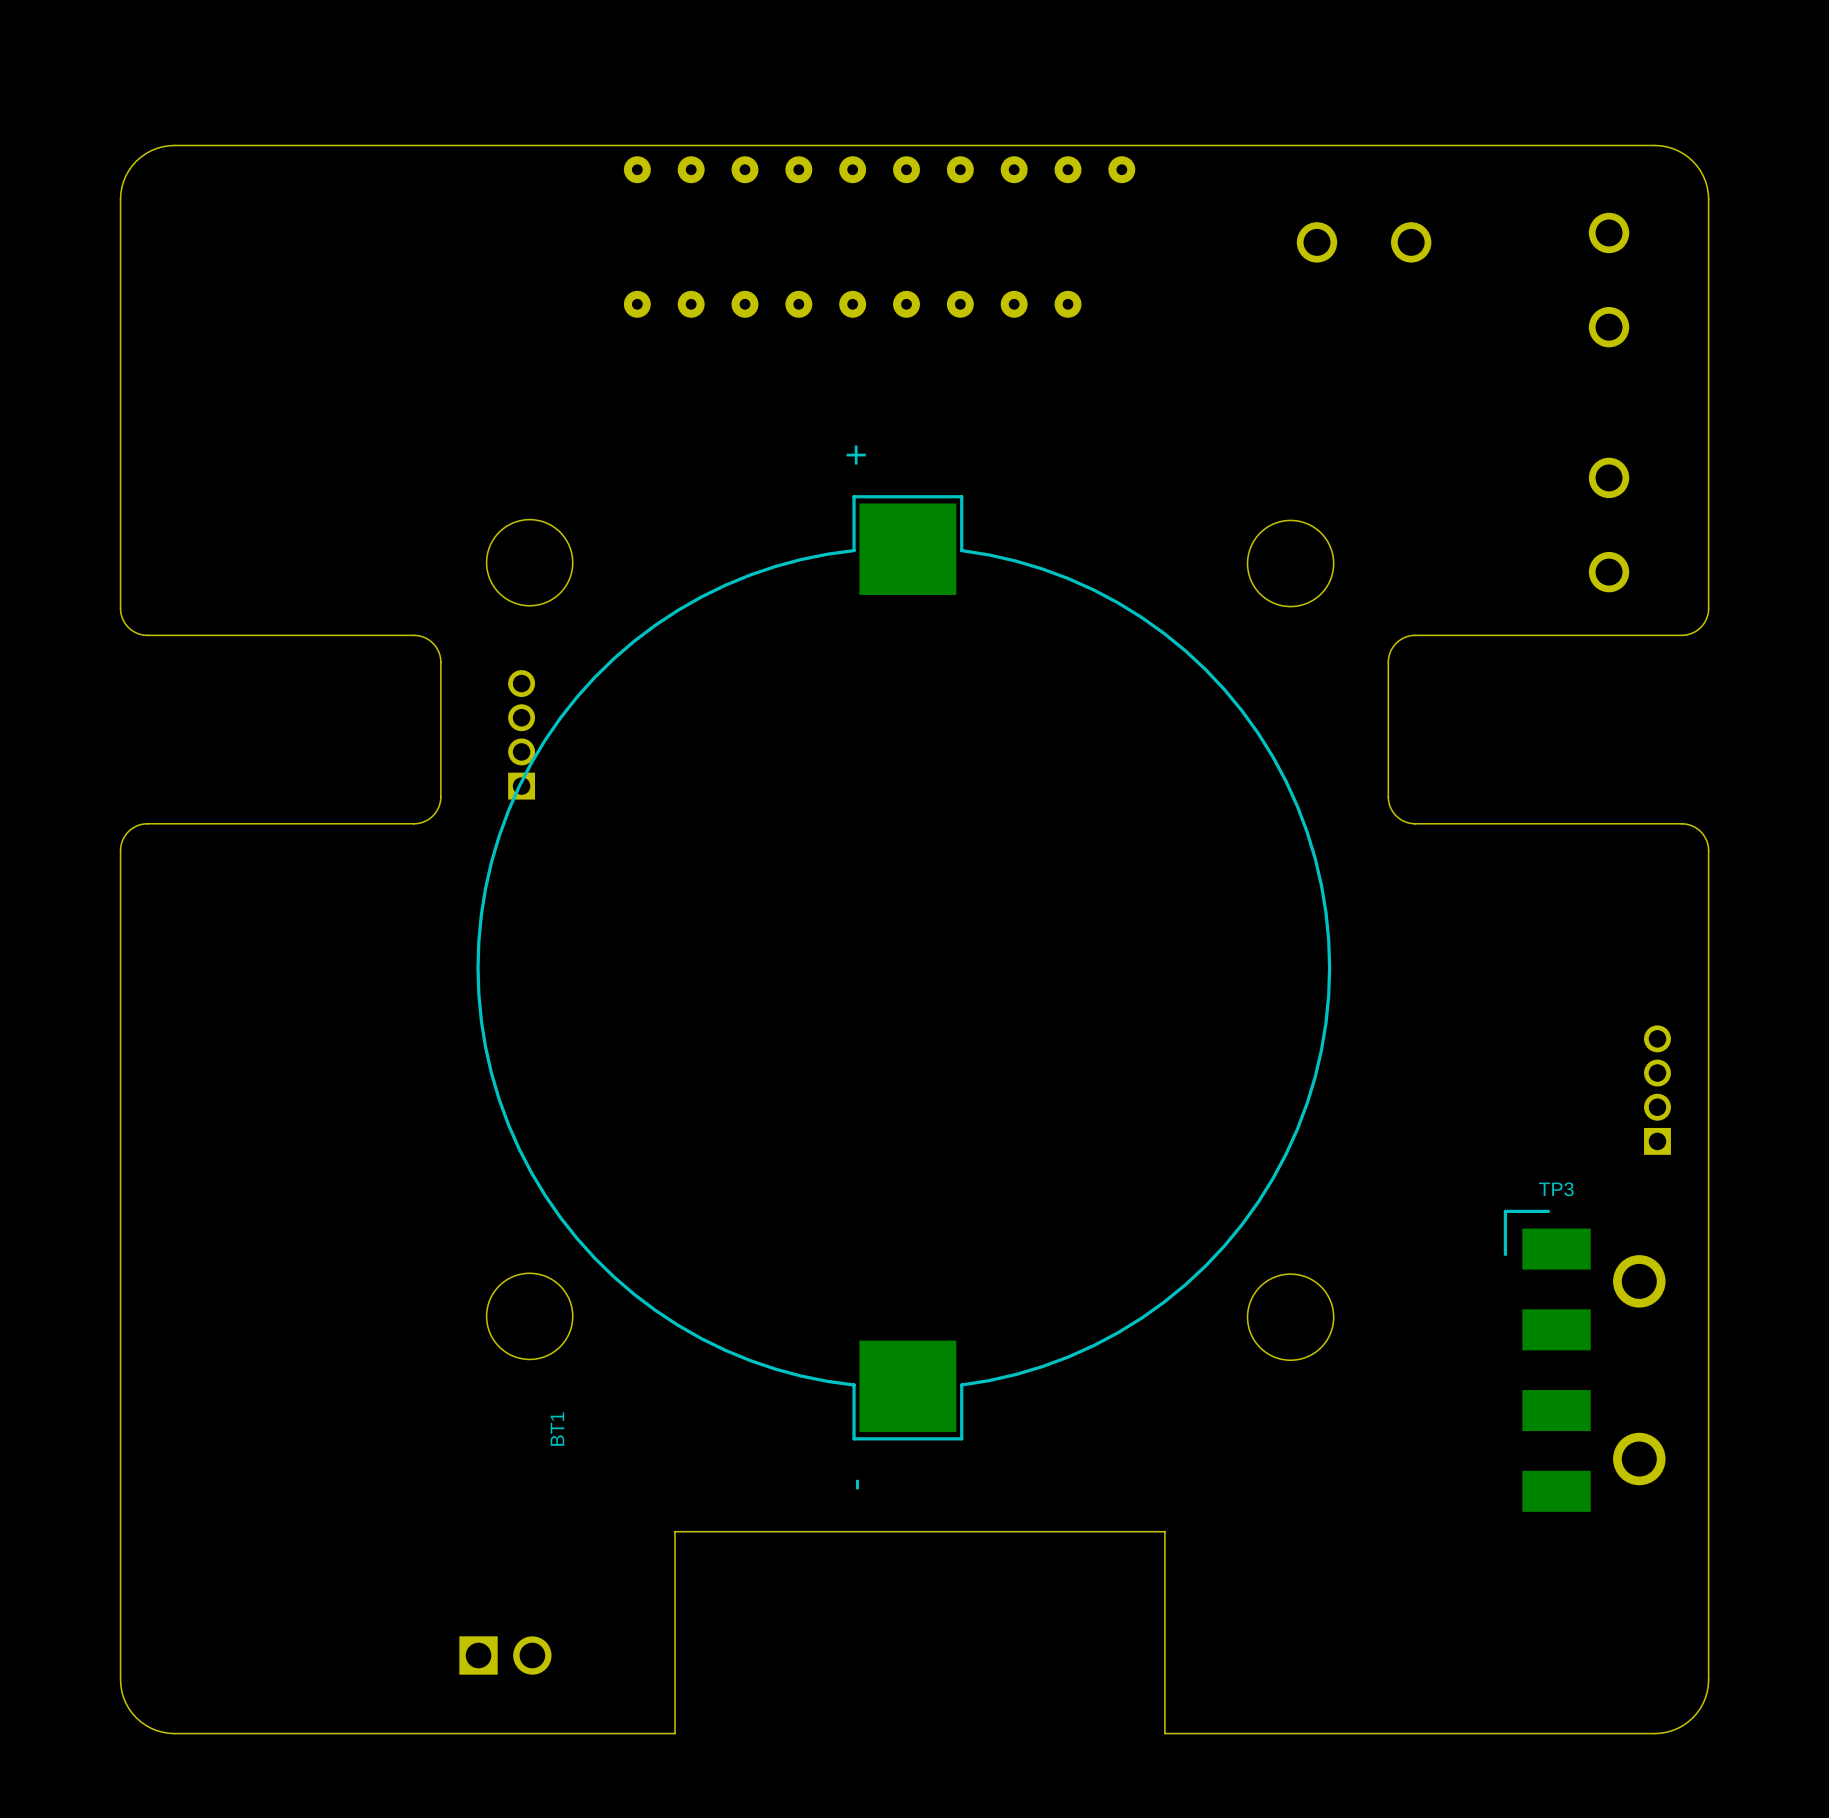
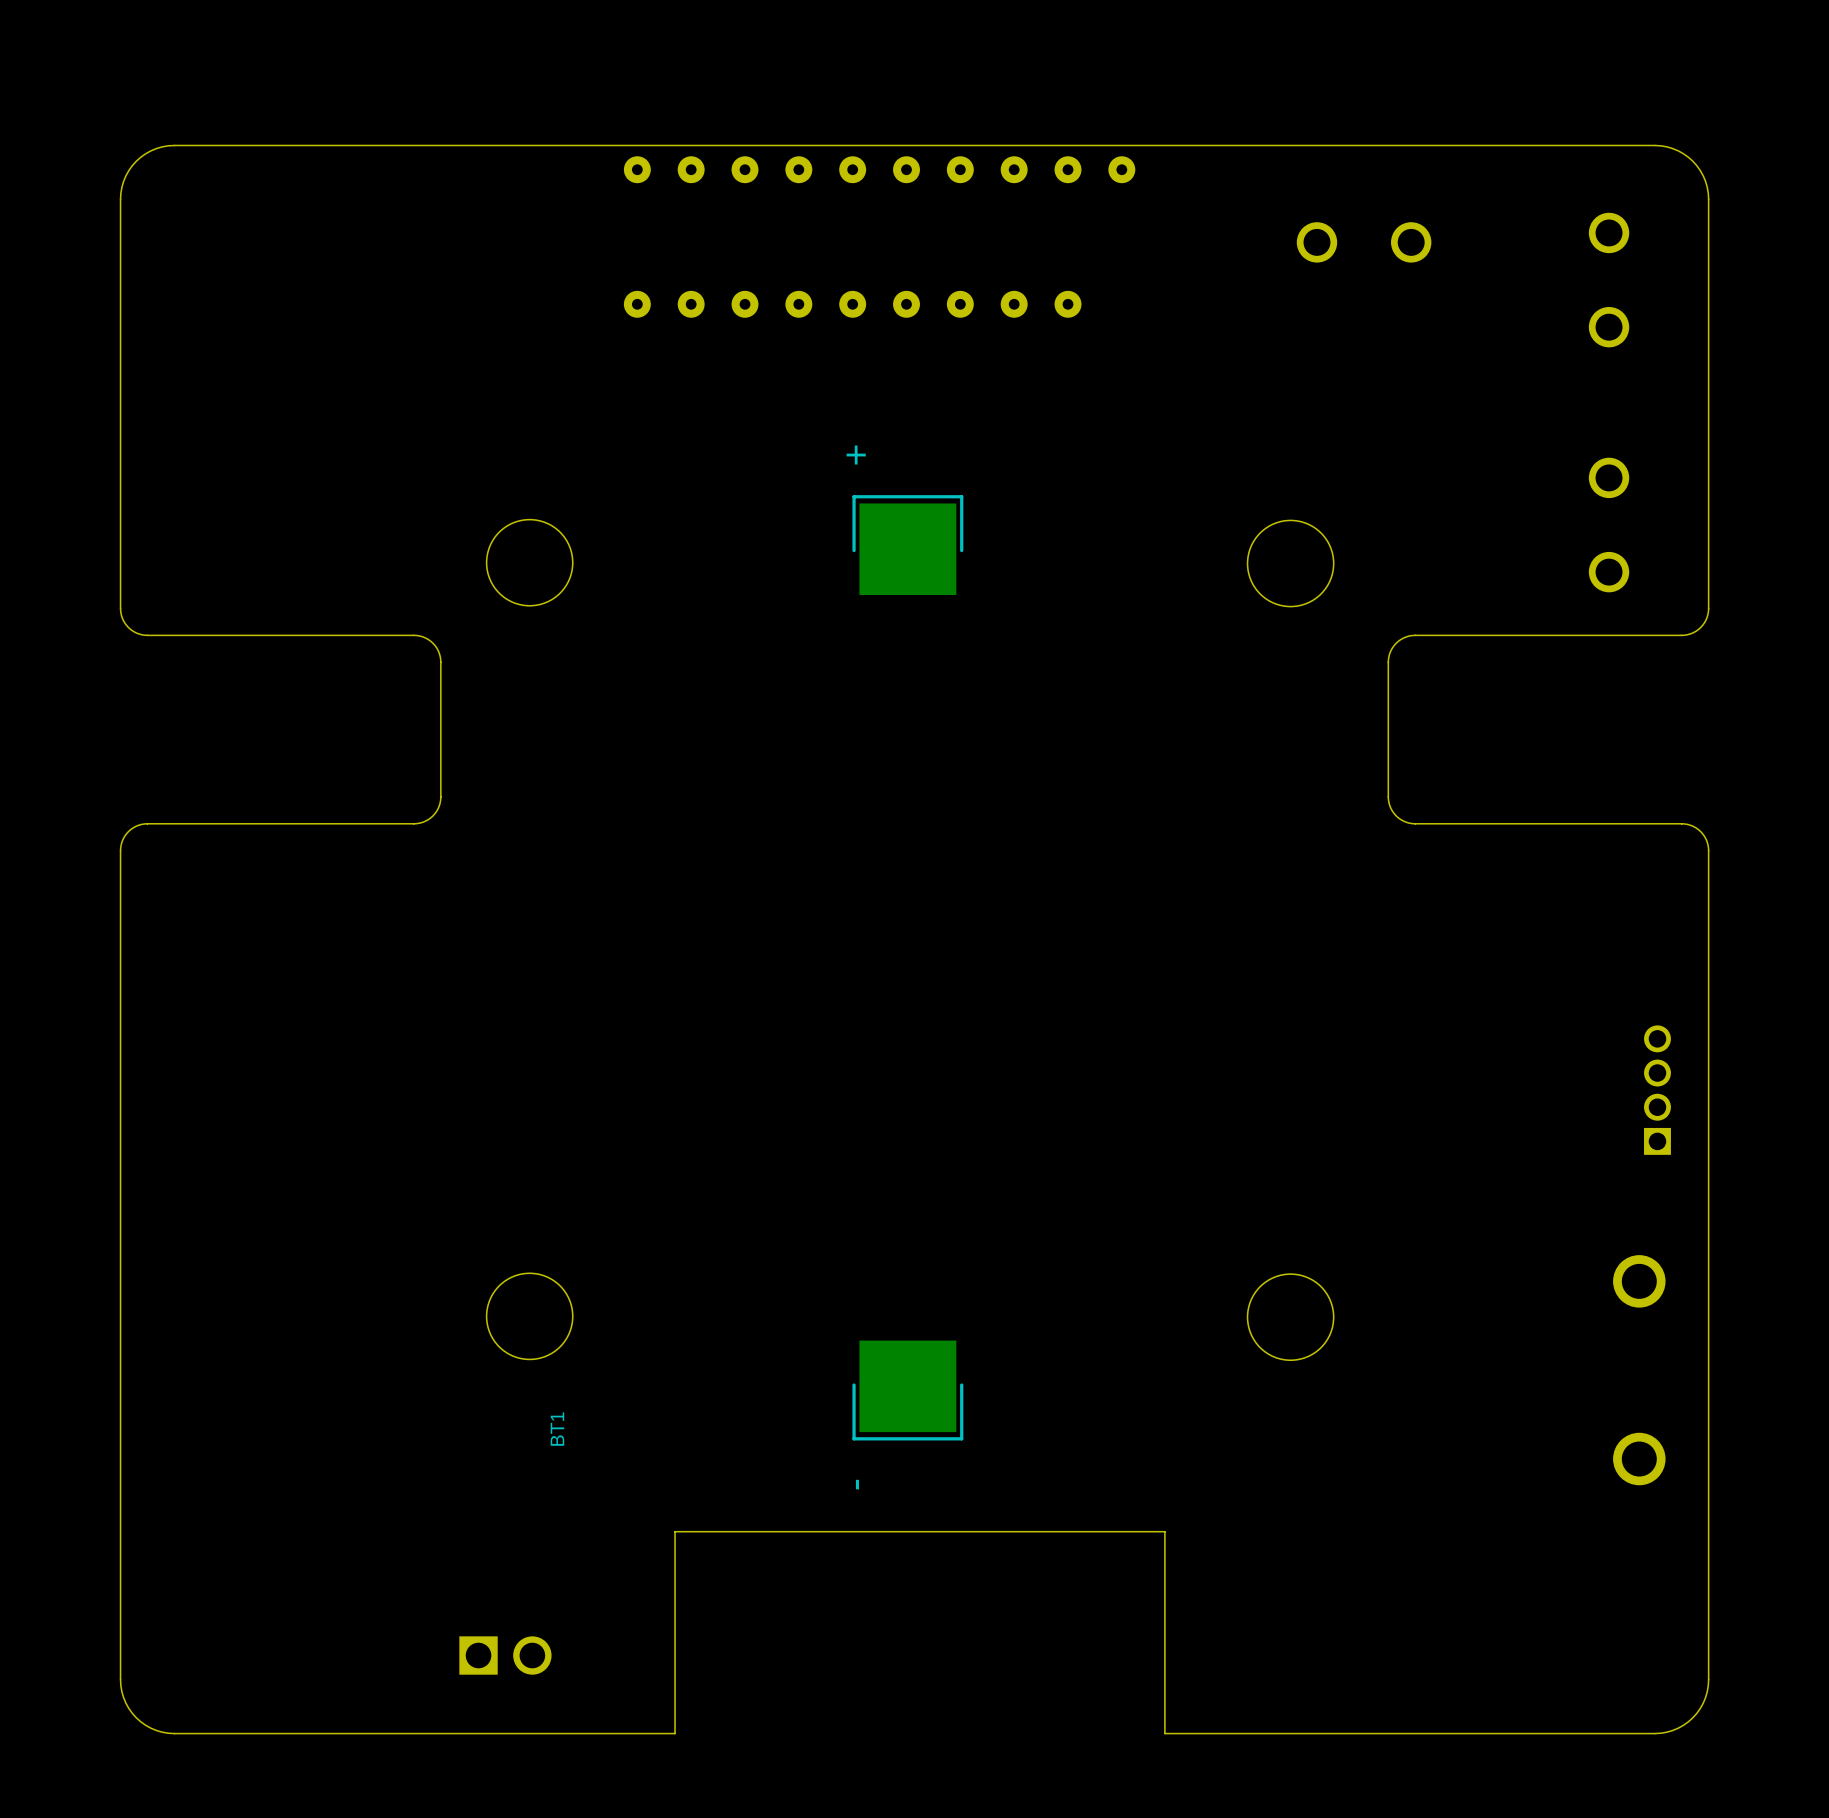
BT1 footprint: [476, 495, 1332, 1441] -> [852, 495, 964, 1441]
part: (521, 734) -> none
TP3: (1547, 1360) -> none

